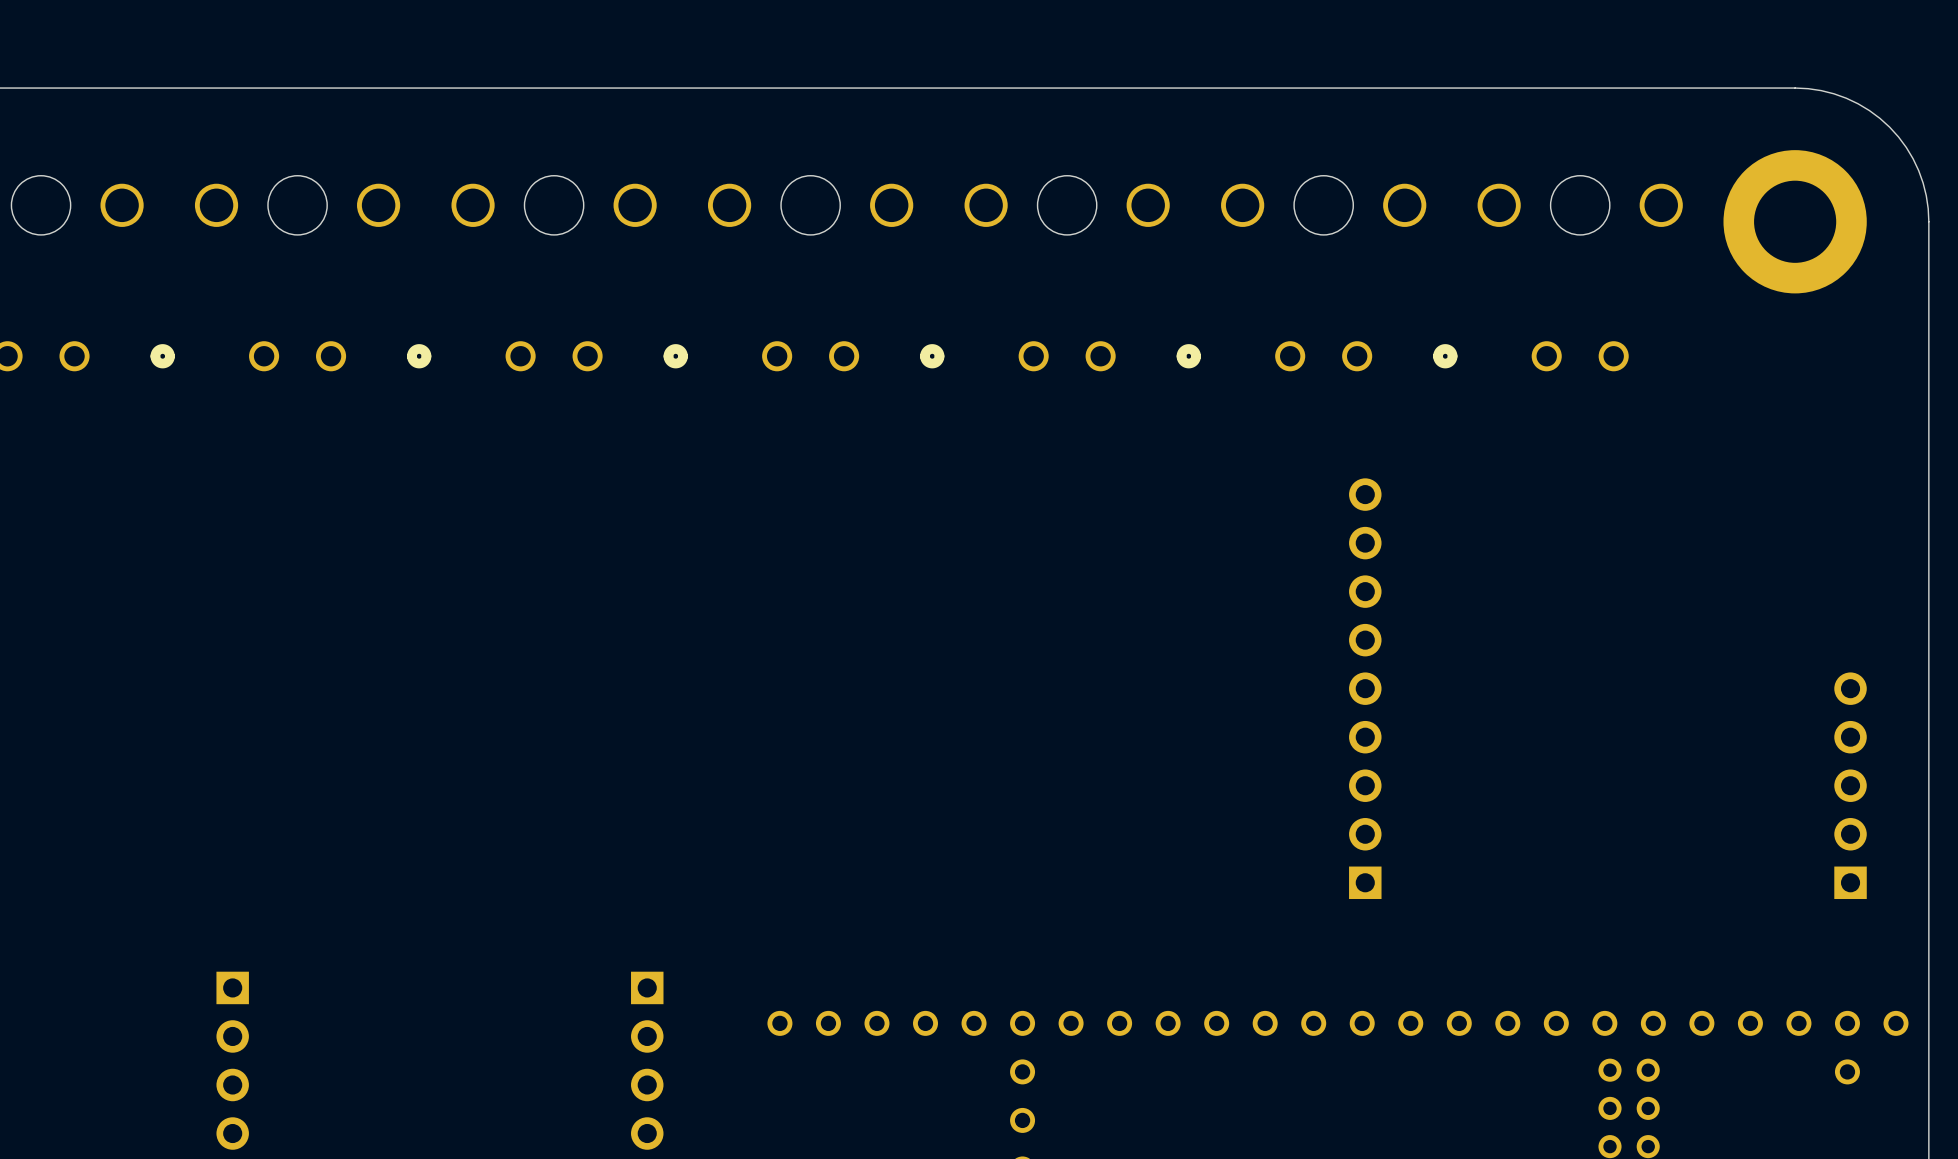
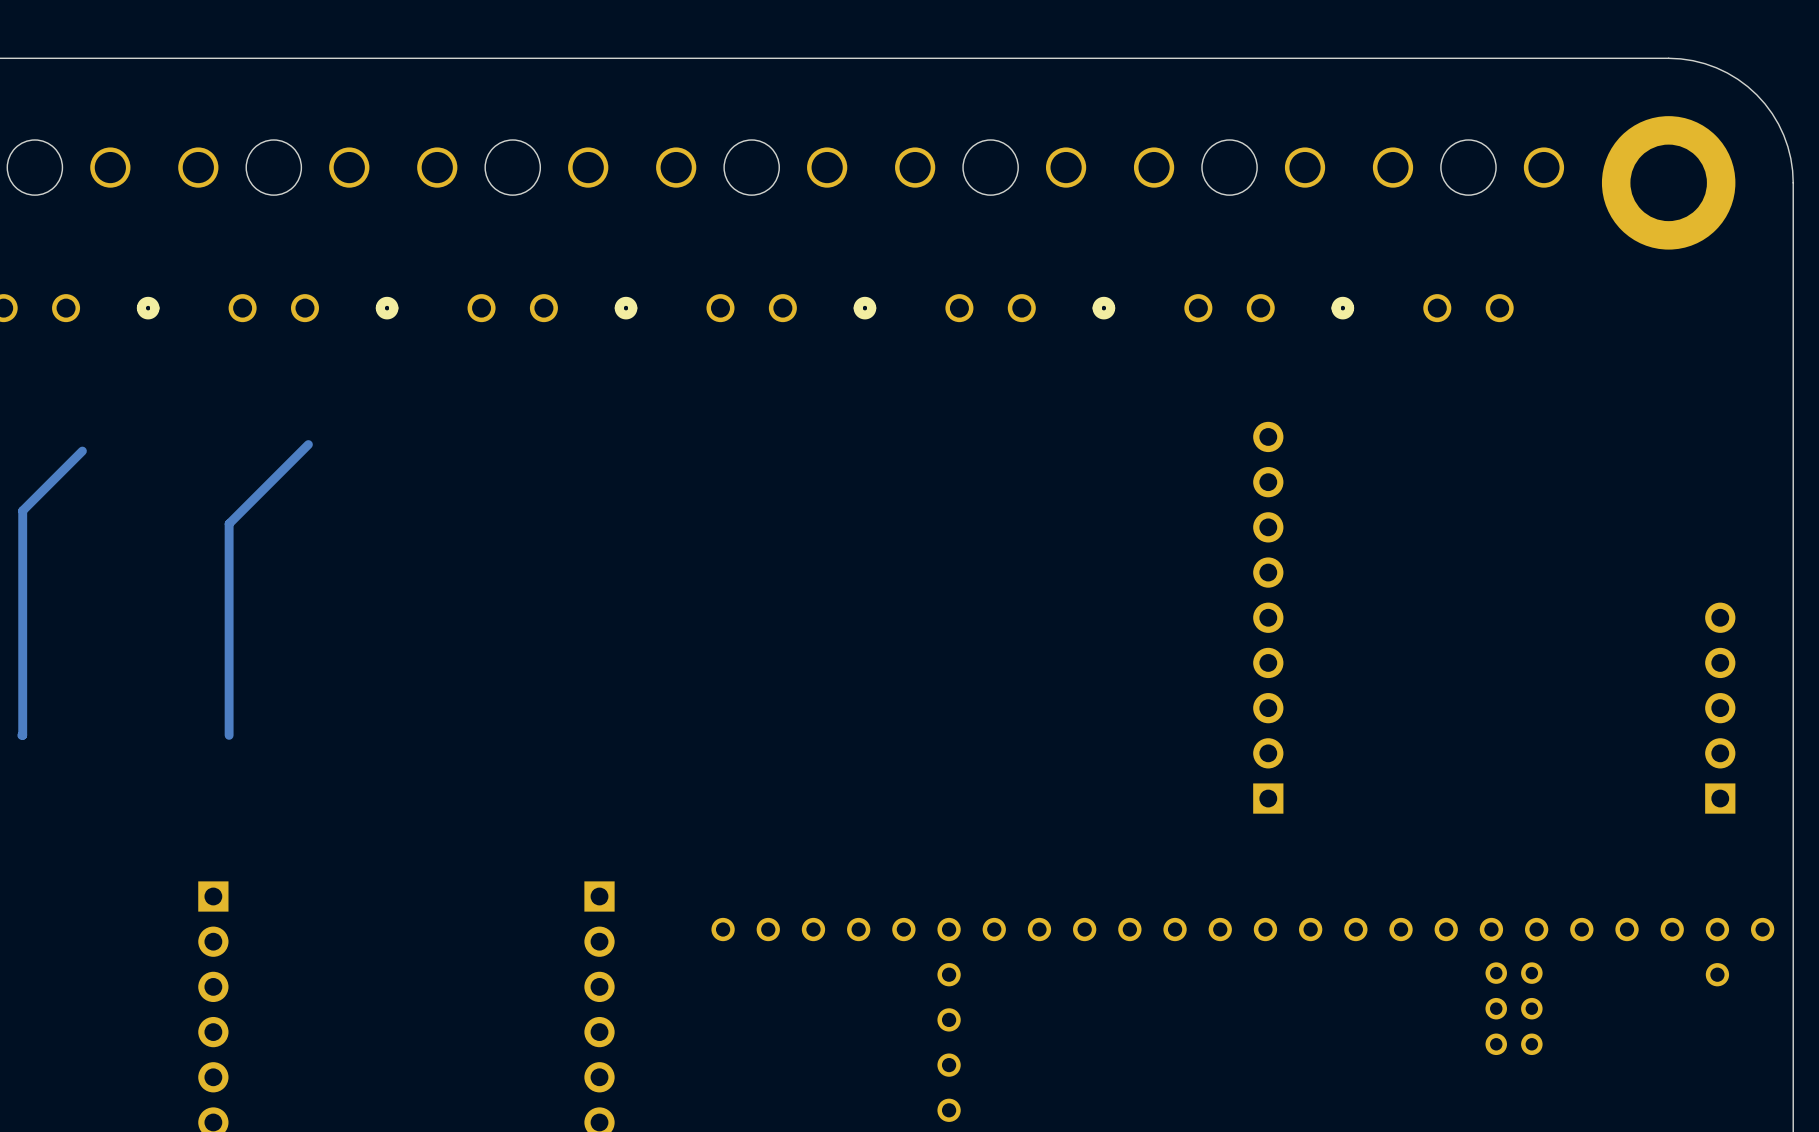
track: none -> (308, 444) (229, 523) (229, 735)
track: none -> (82, 451) (22, 510) (21, 735)

